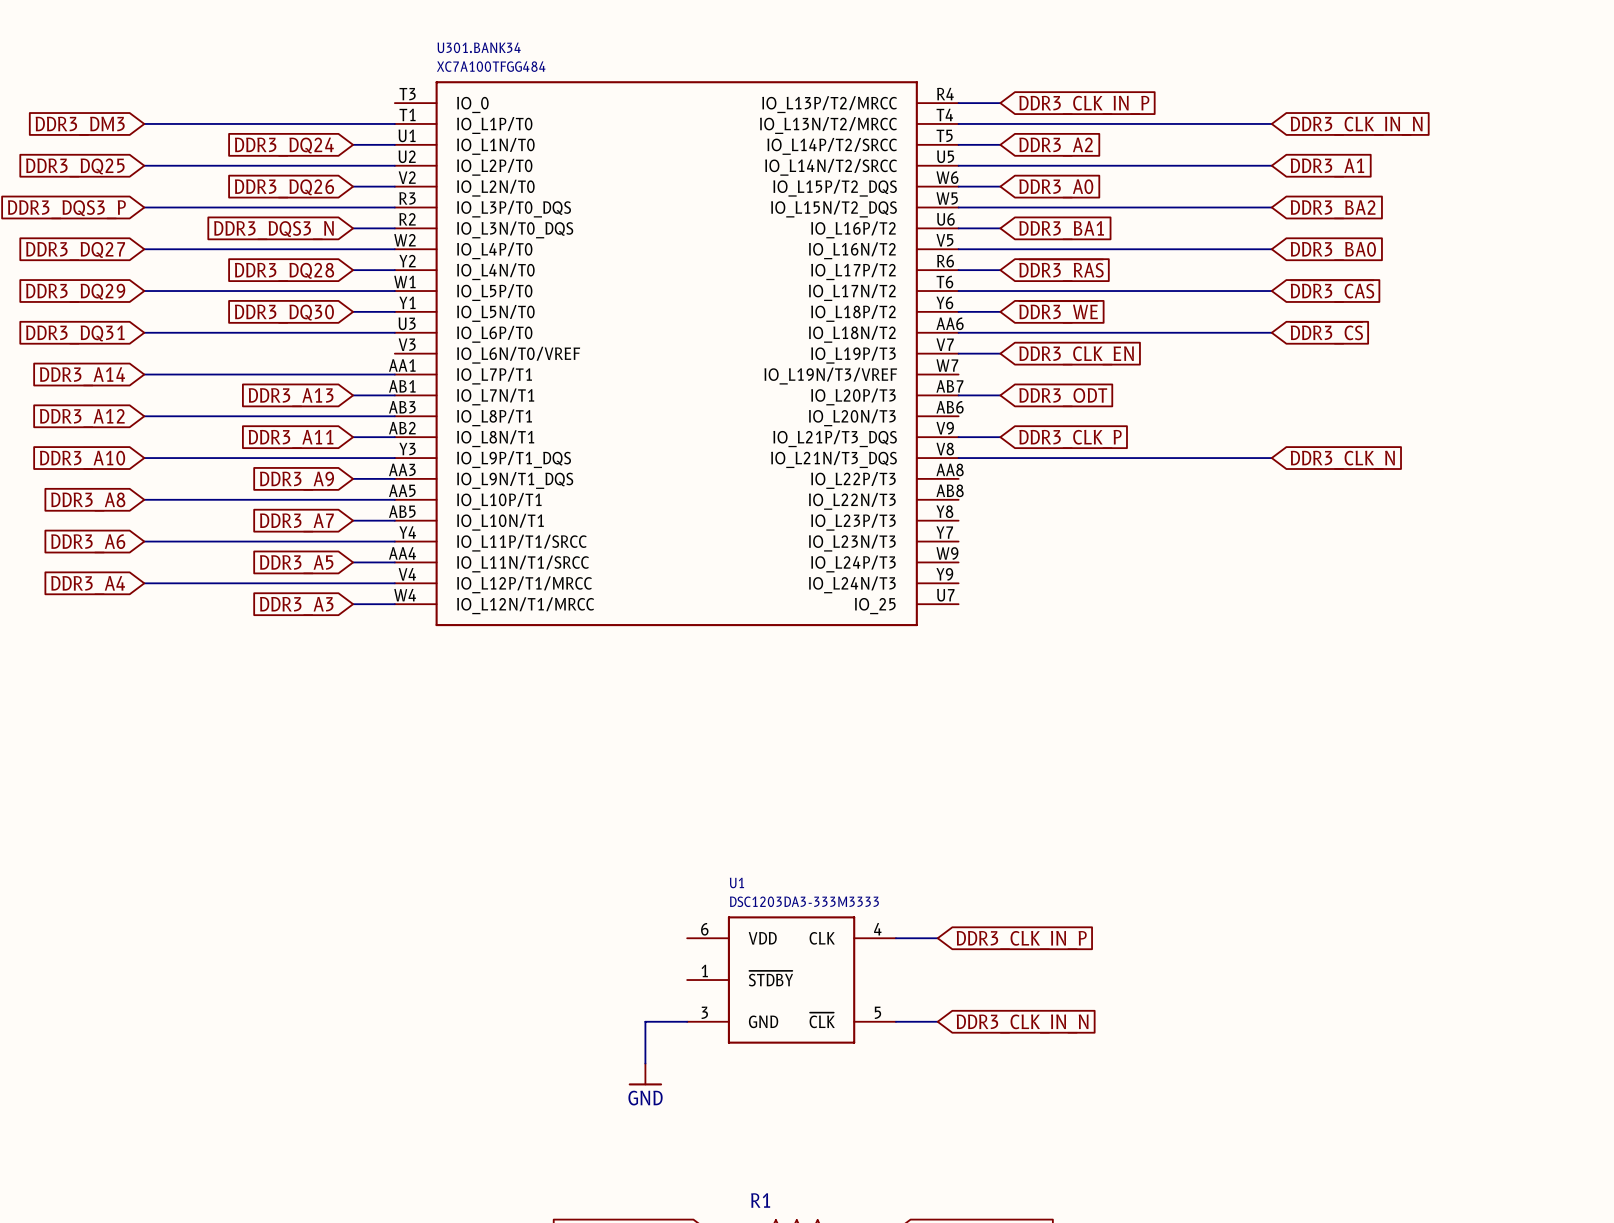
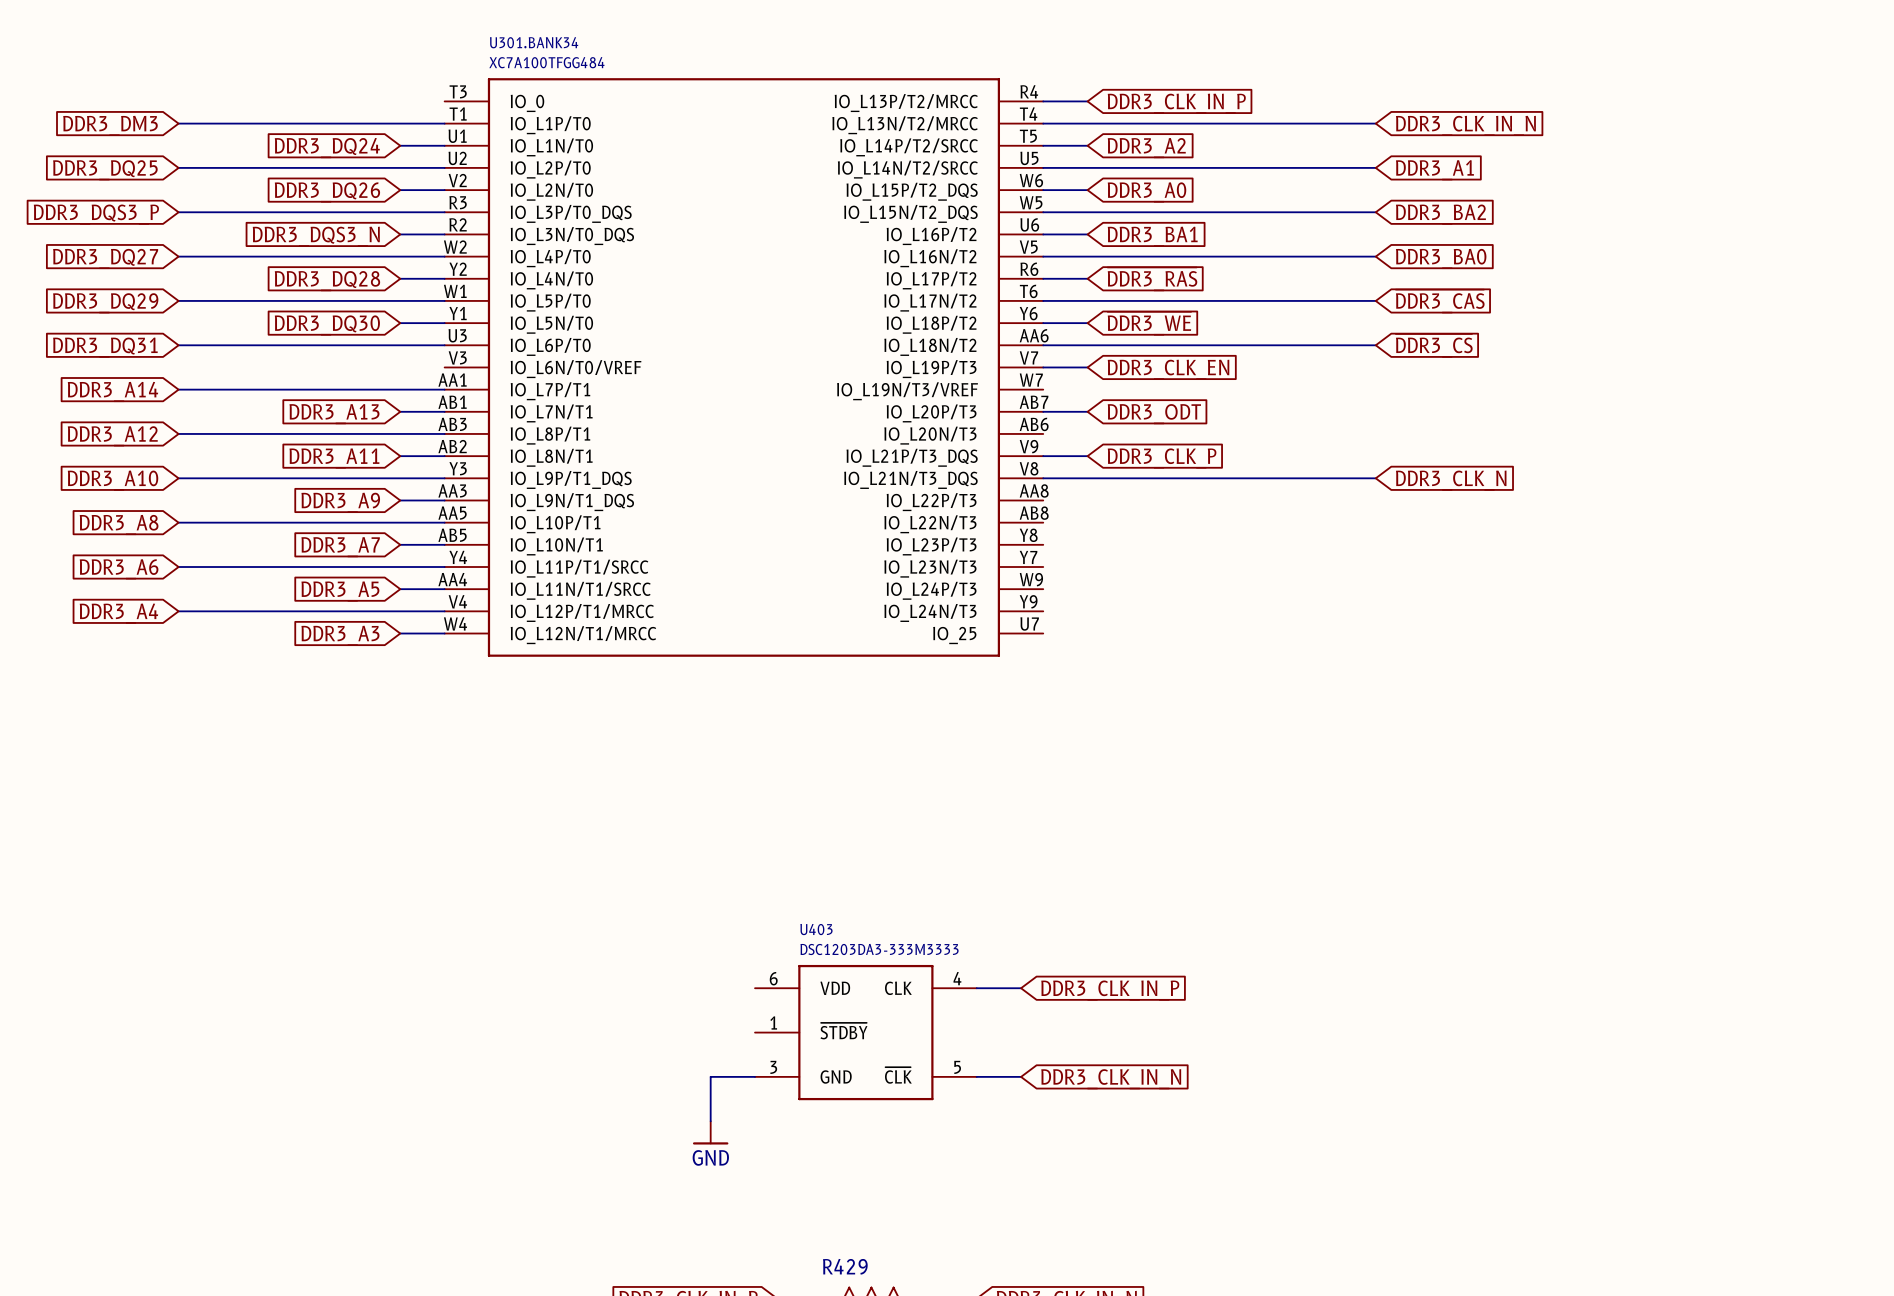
U1 name: U1 (736, 882) -> U403 (816, 929)
R1 name: R1 (760, 1200) -> R429 (845, 1266)

